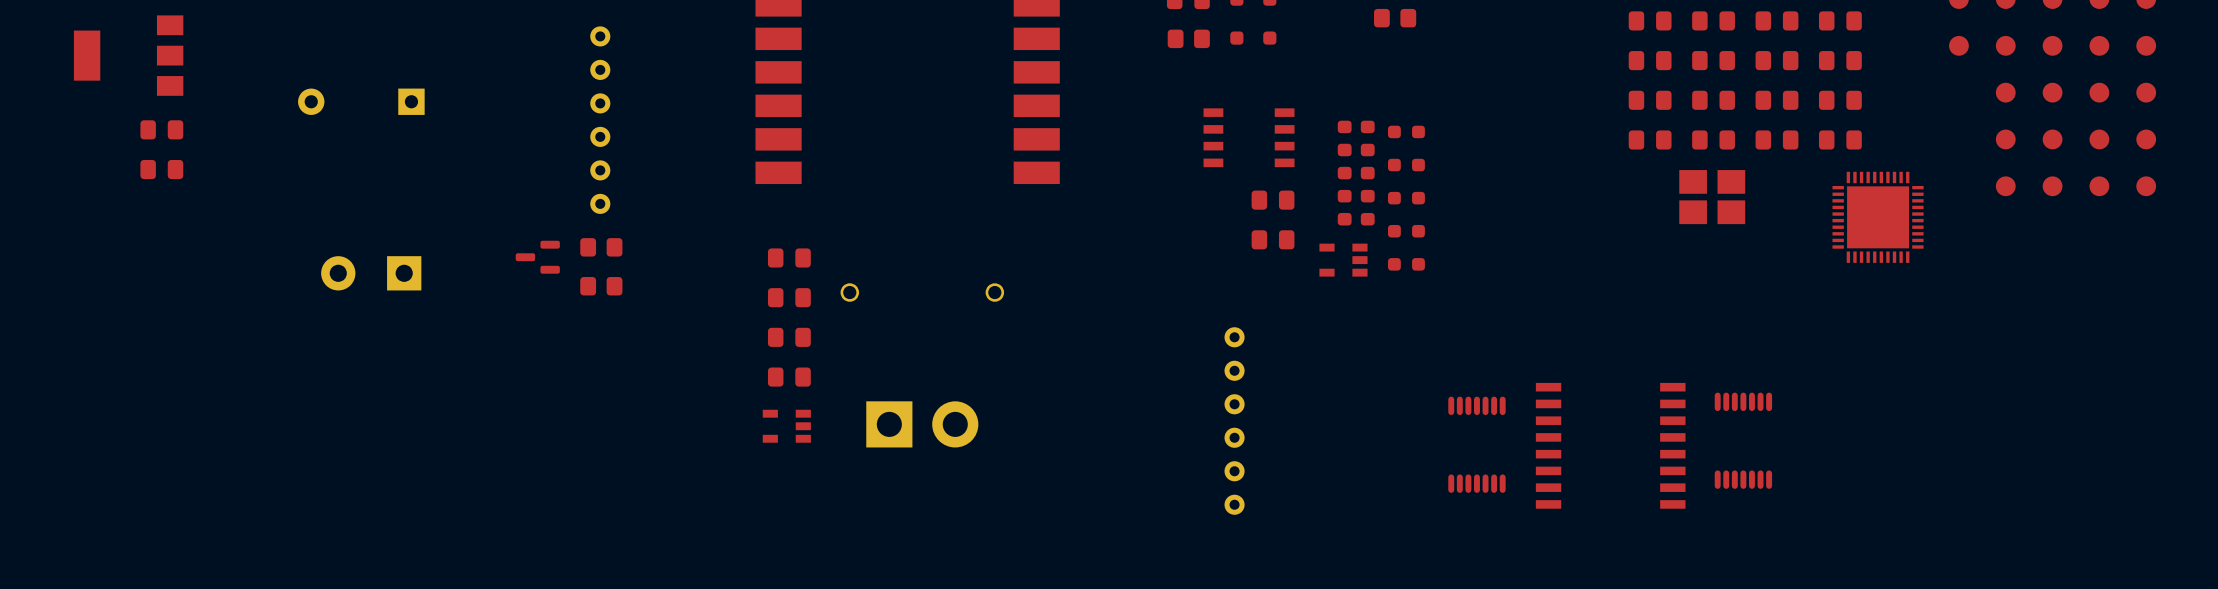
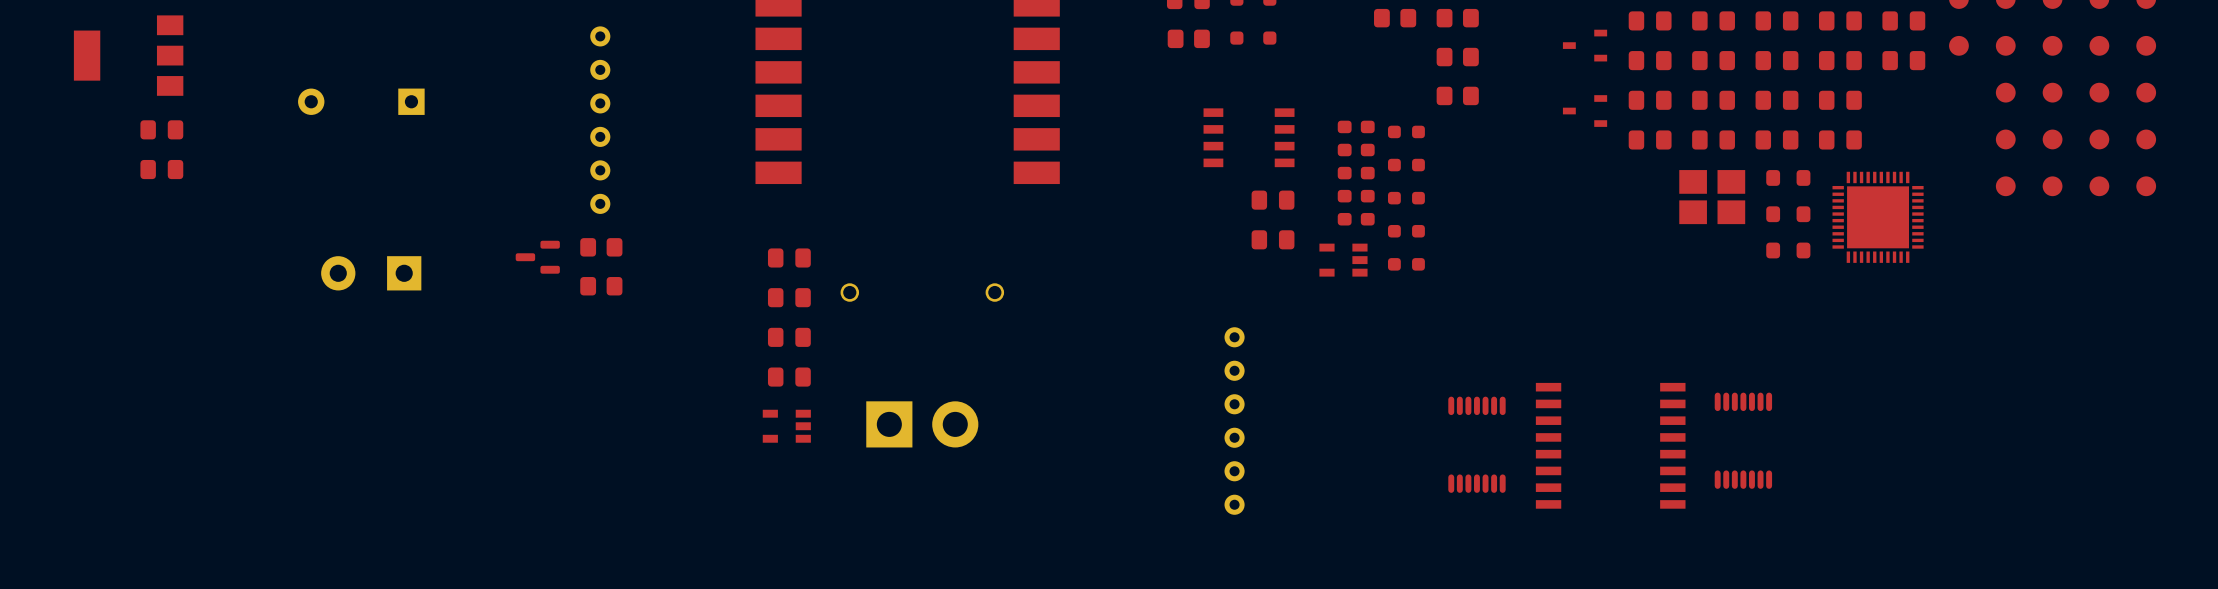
part: none -> (1457, 18)
part: none -> (1903, 20)
part: none -> (1585, 45)
part: none -> (1457, 57)
part: none -> (1903, 60)
part: none -> (1457, 95)
part: none -> (1585, 111)
part: none -> (1788, 177)
part: none -> (1788, 214)
part: none -> (1788, 250)

